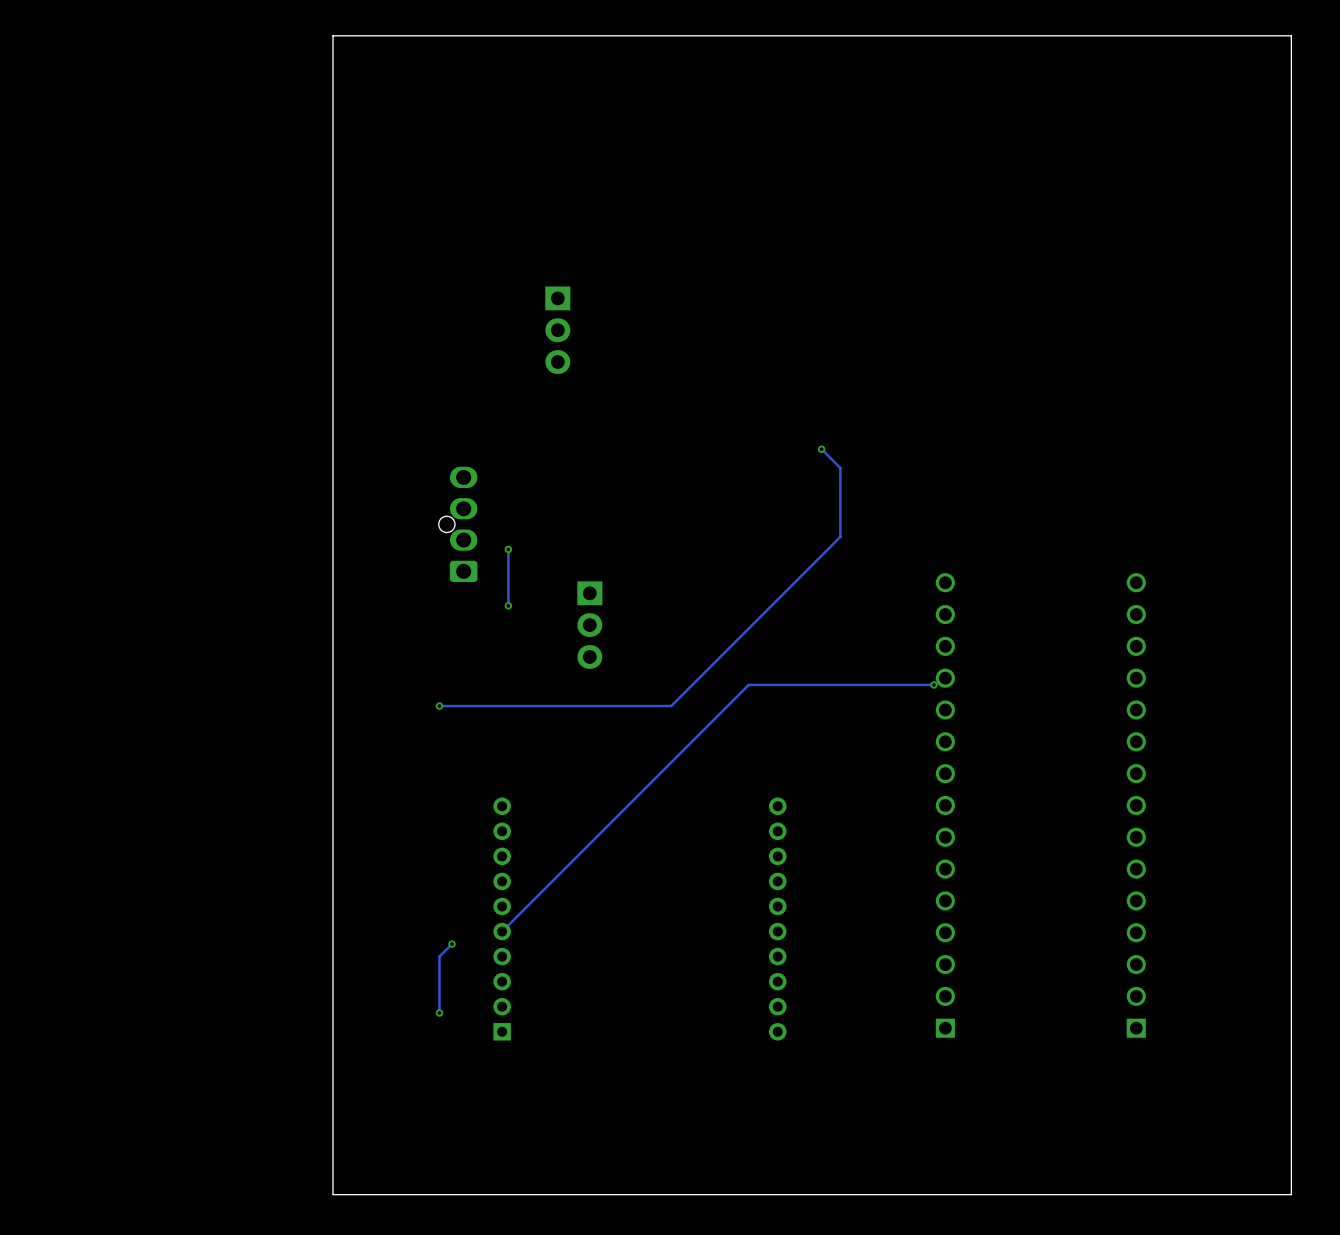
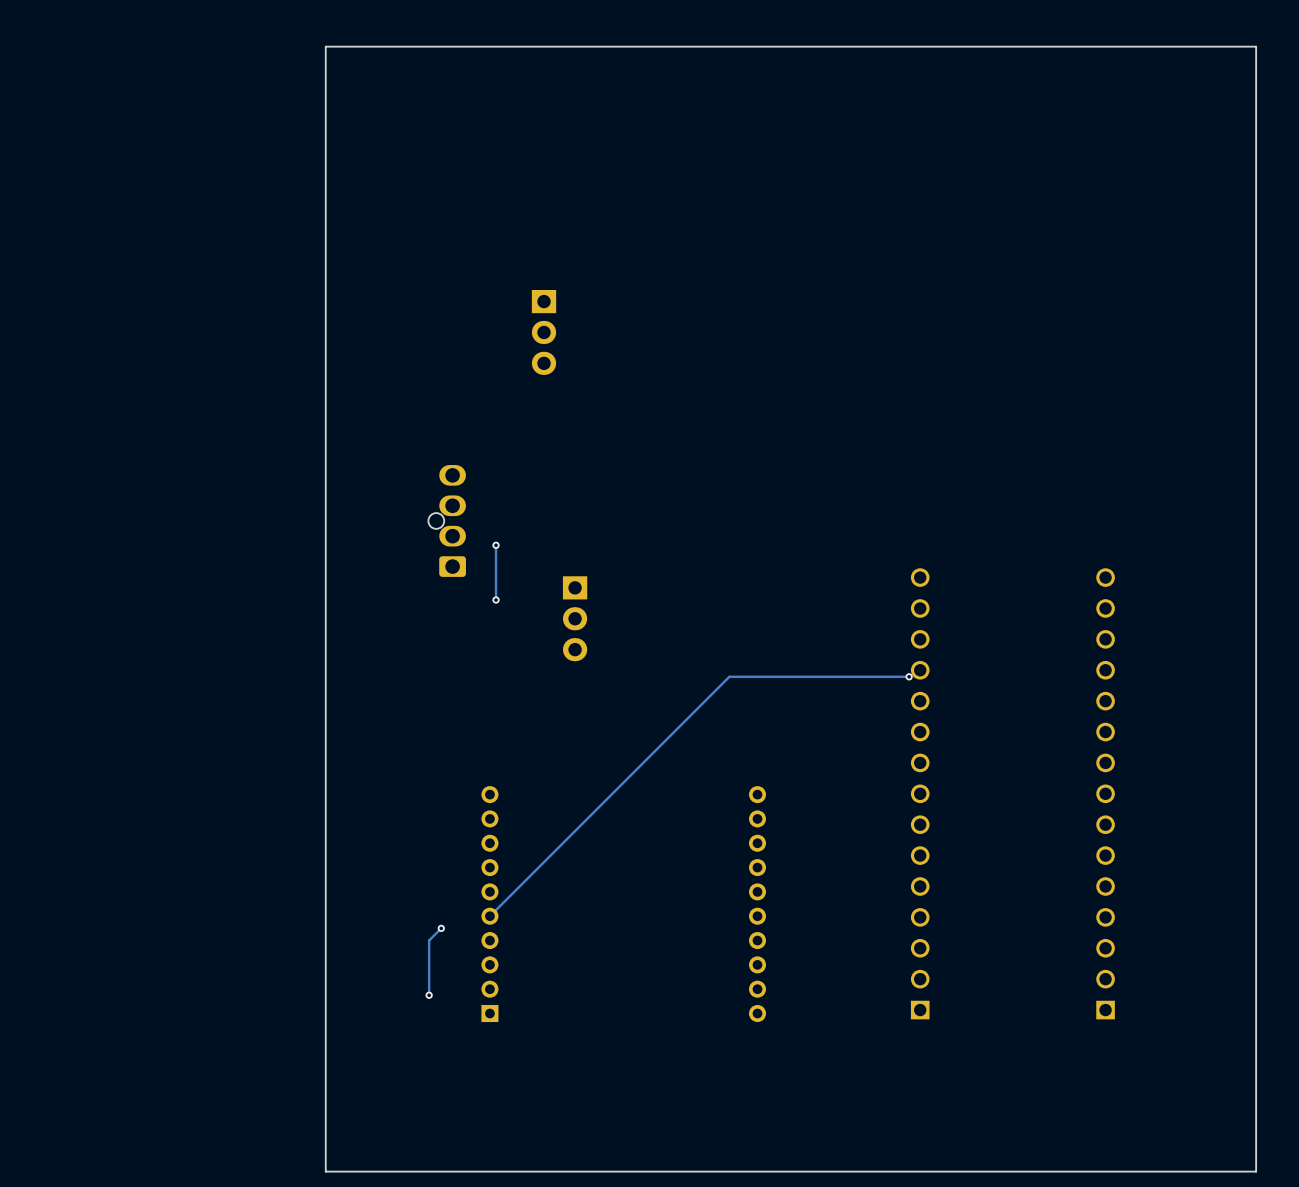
track: (821, 449) (840, 468) (840, 536) (671, 706) (439, 706) -> none
via: (821, 449) -> none
via: (439, 706) -> none

